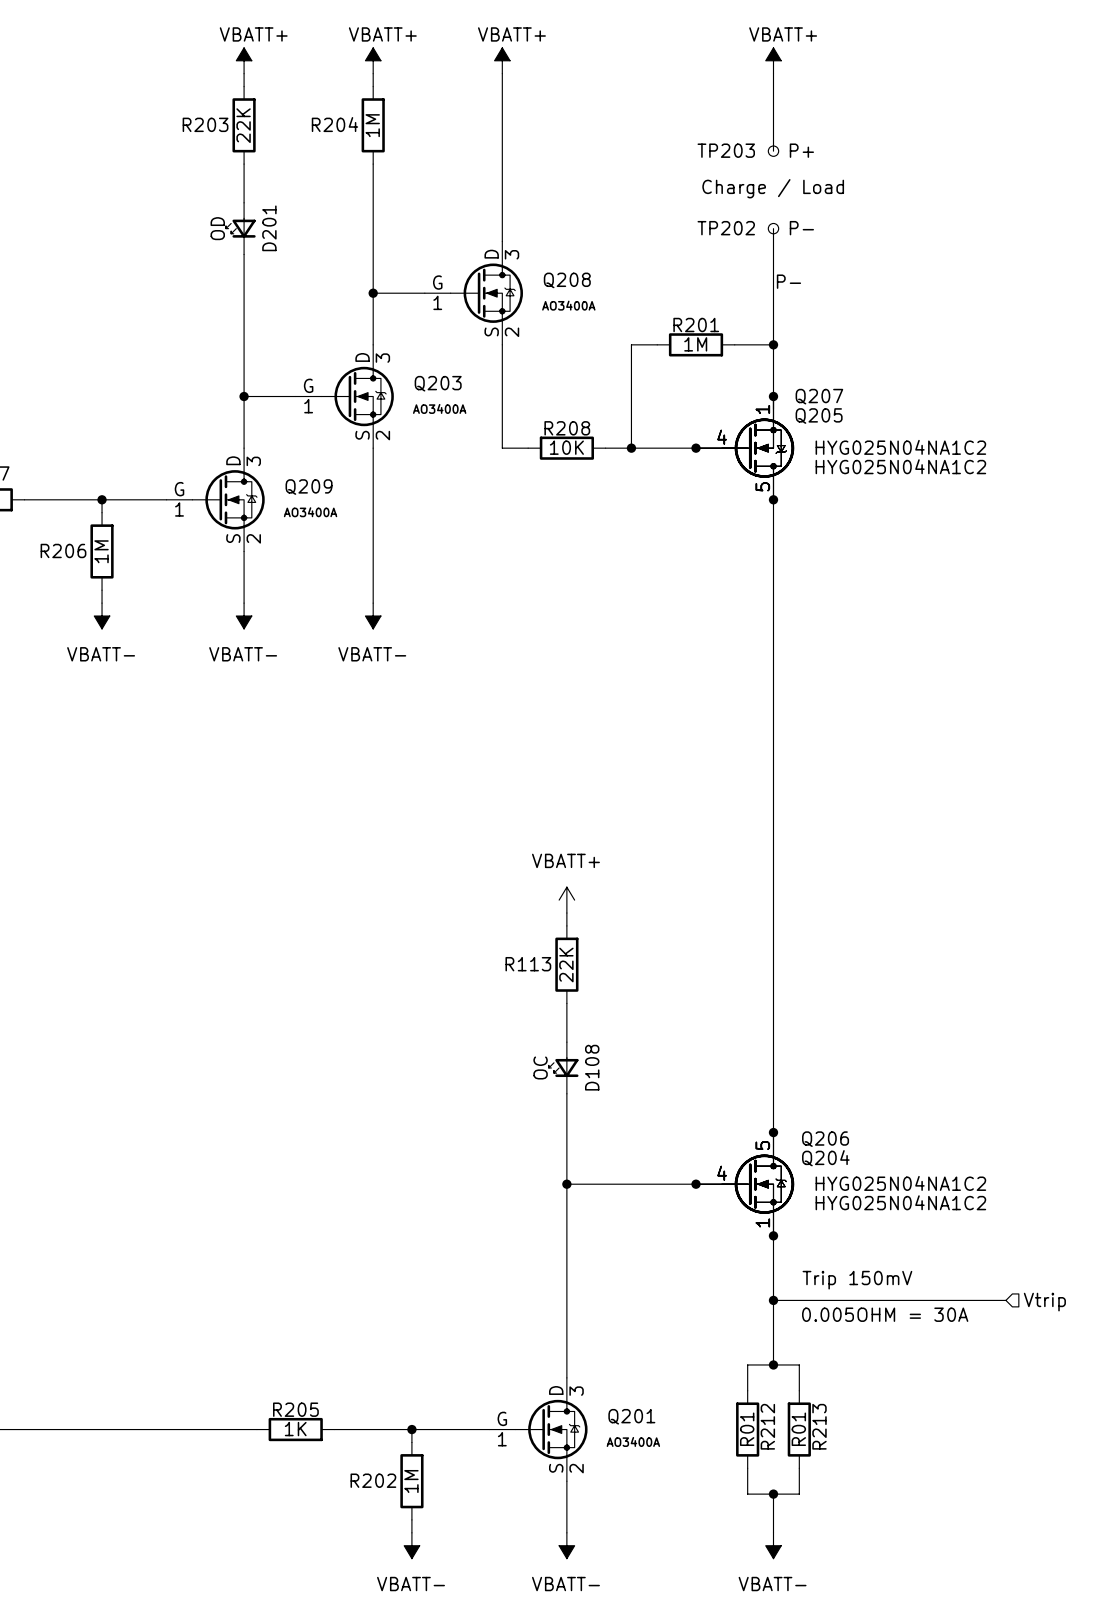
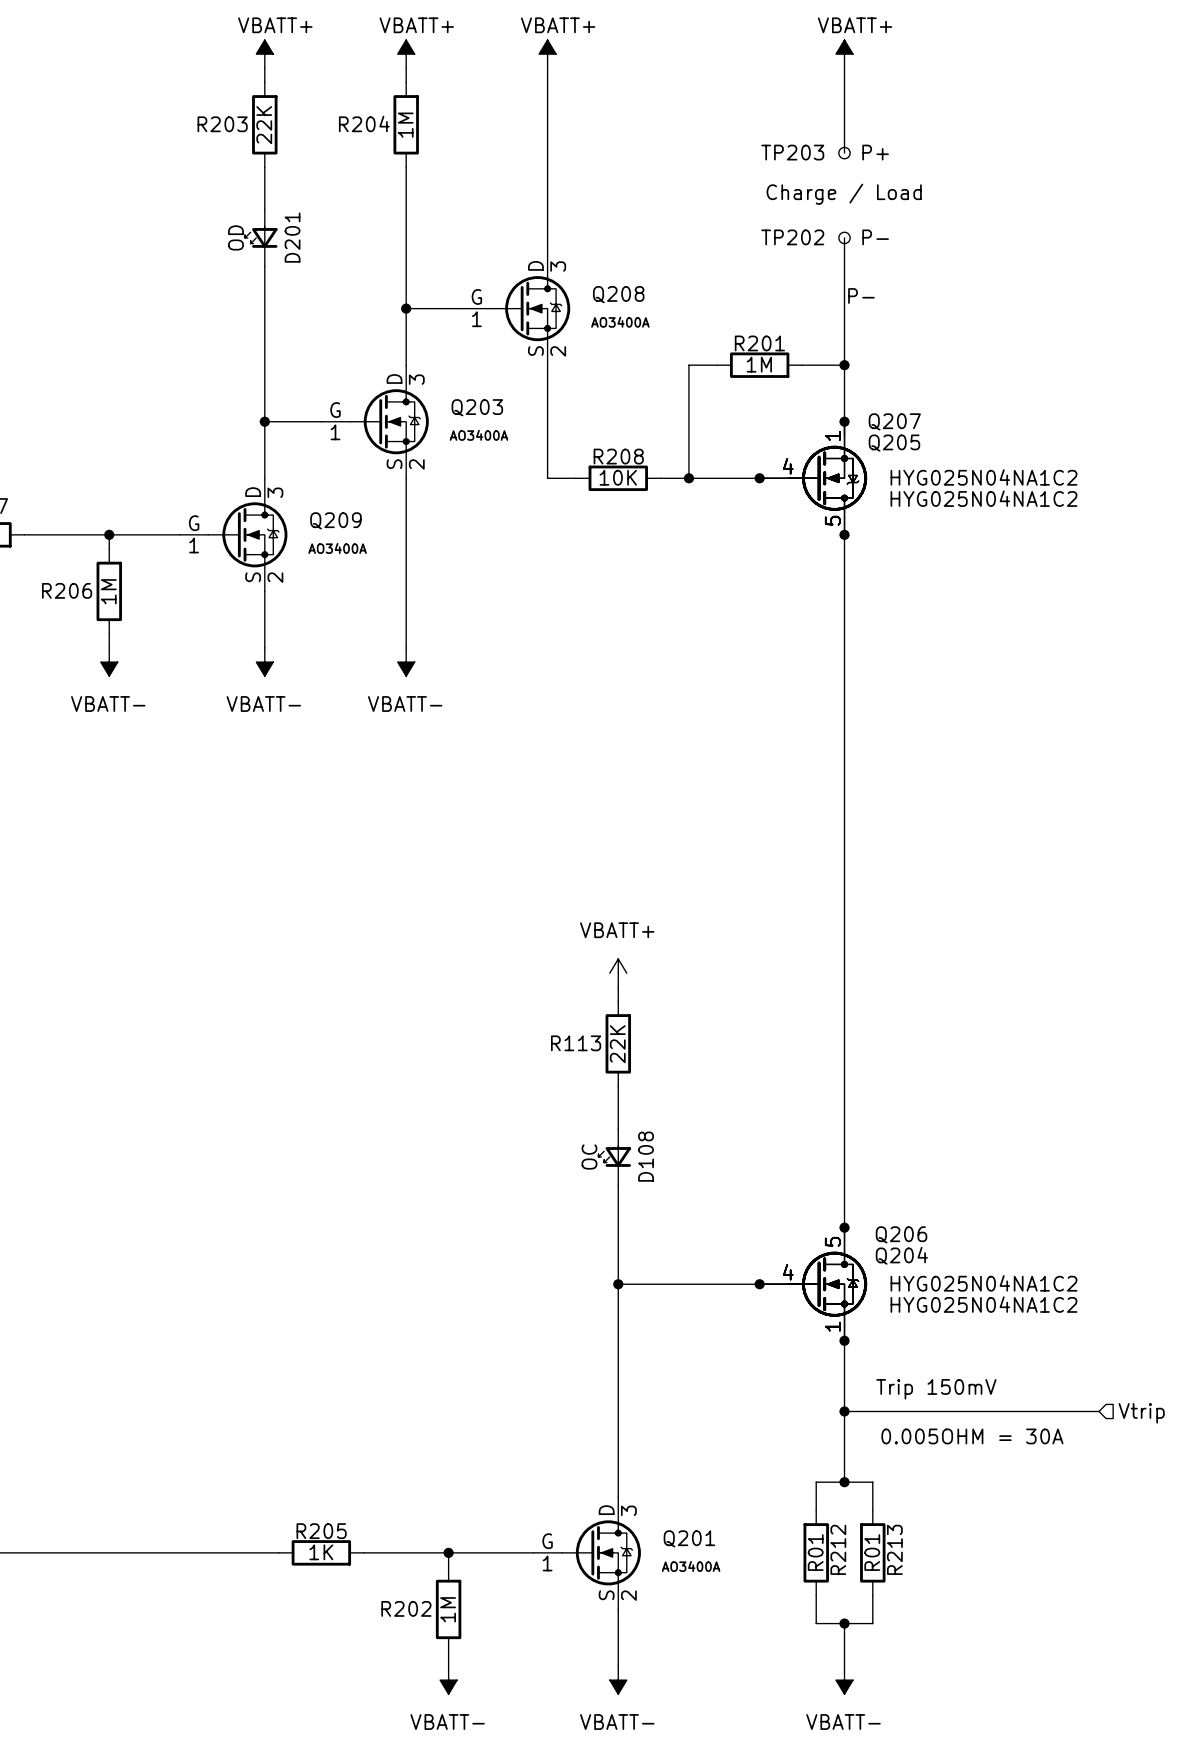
label: 0.005OHM = 30A (885, 1314) -> none
text: none -> 0.005OHM = 30A (972, 1436)

